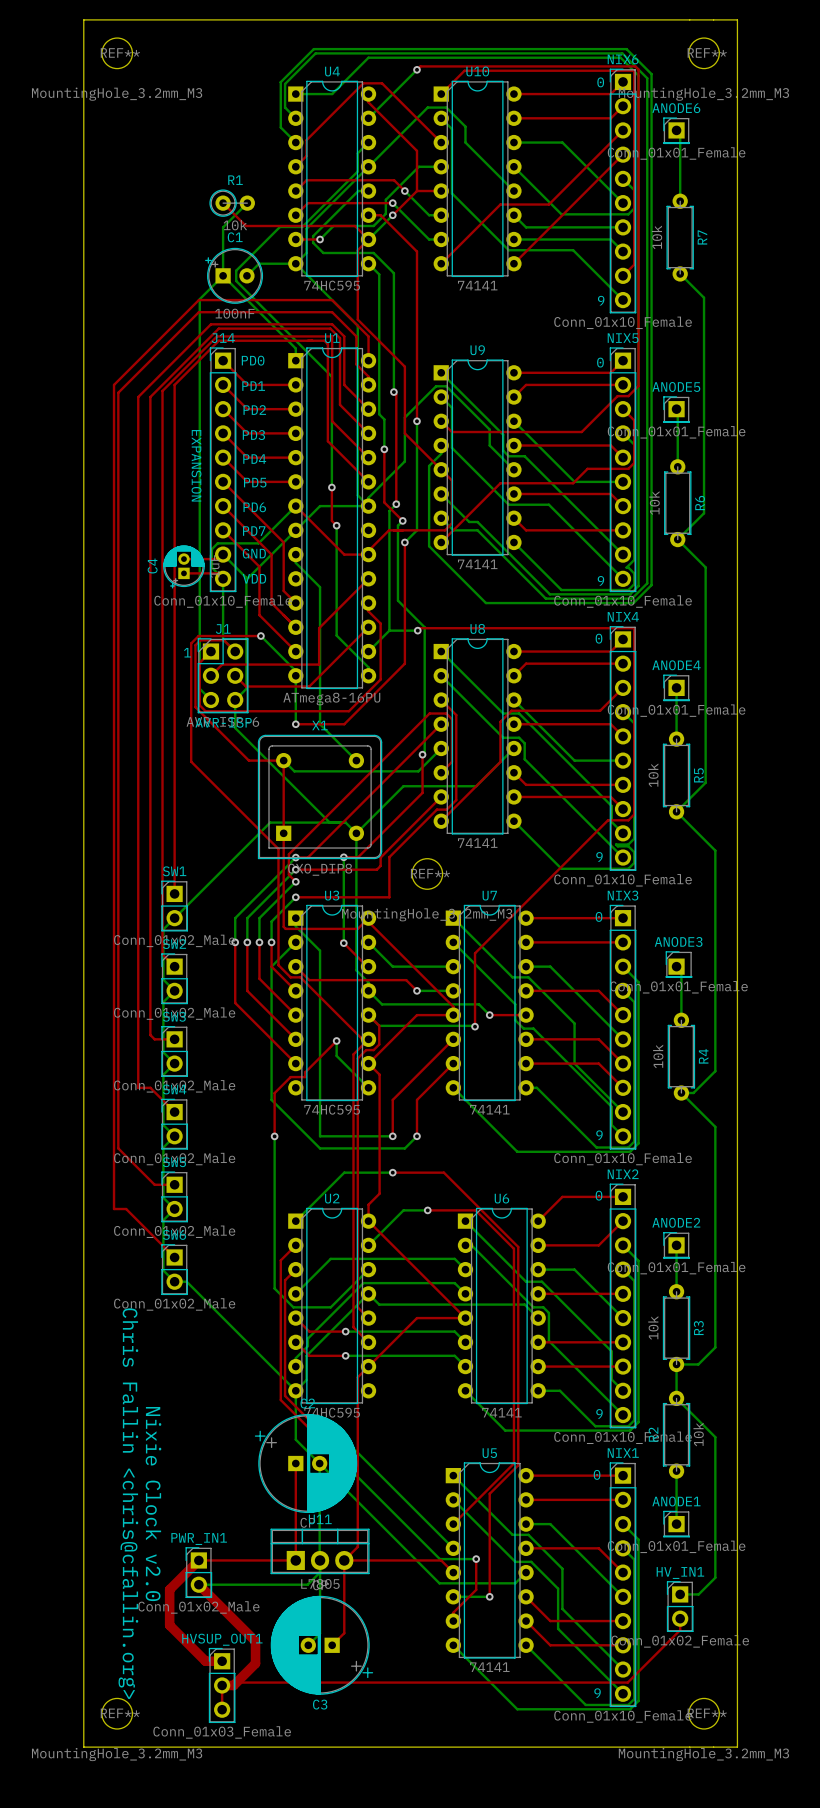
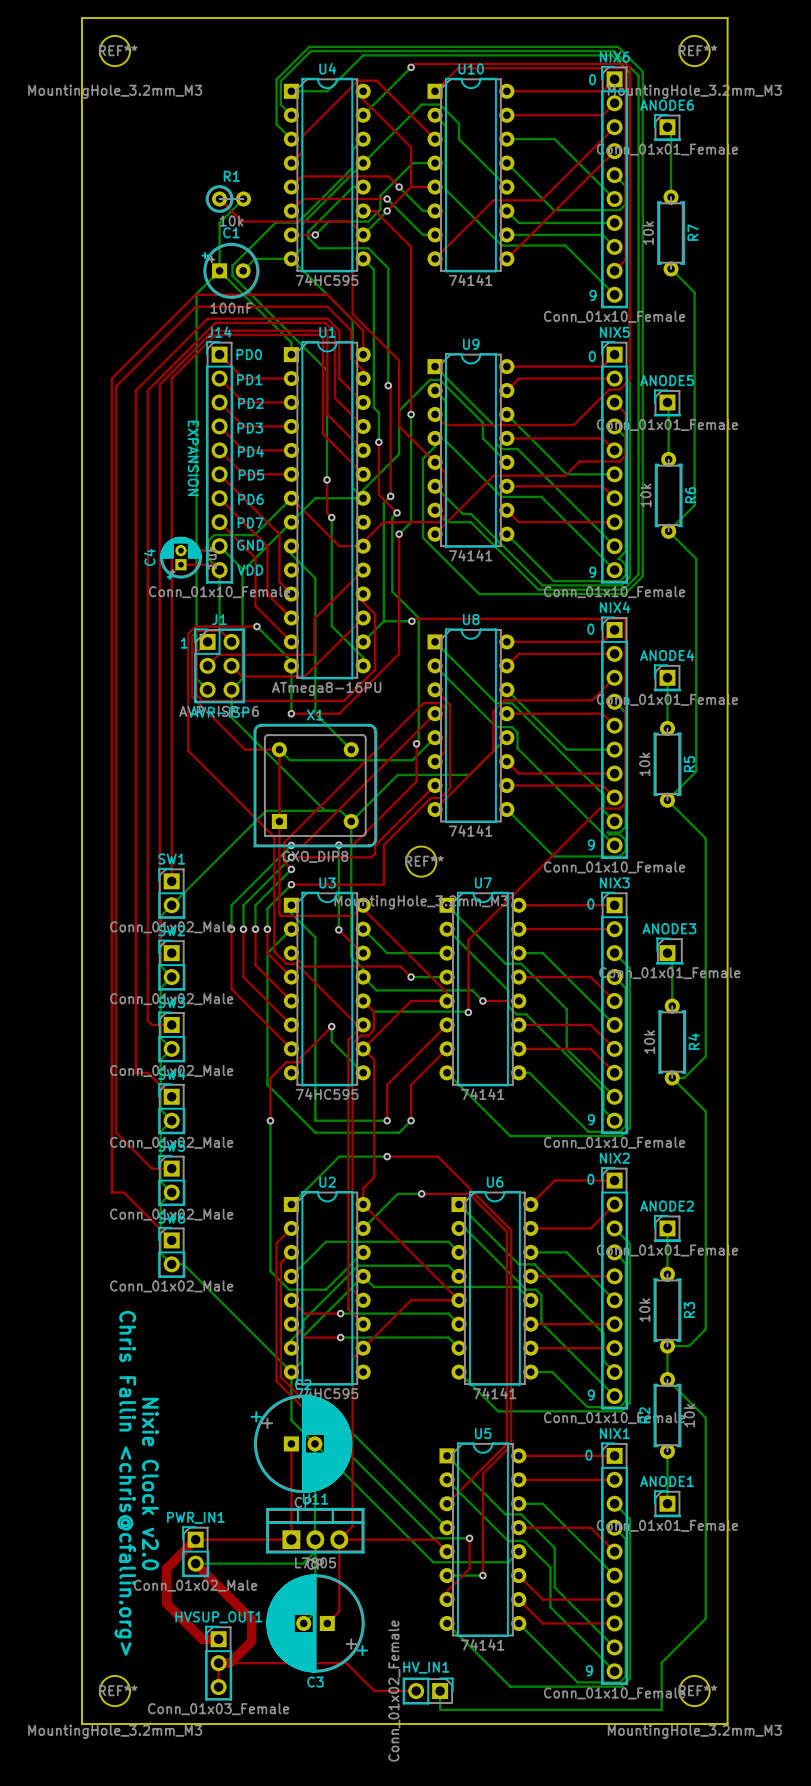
bottom track: (715, 1577) (698, 1594) (680, 1594) (675, 1589) -> (705, 1556) (705, 1618) (661, 1662) (661, 1709) (440, 1709) (440, 1691)
HV_IN1 rotation: 0° (680, 1606) -> 90° clockwise (428, 1691)
HV_IN1 position: (680, 1606) -> (428, 1691)
top track: (680, 1618) (680, 1630) (627, 1682) (225, 1682) -> none
top track: none -> (218, 1663) (346, 1663) (374, 1691) (416, 1691)

